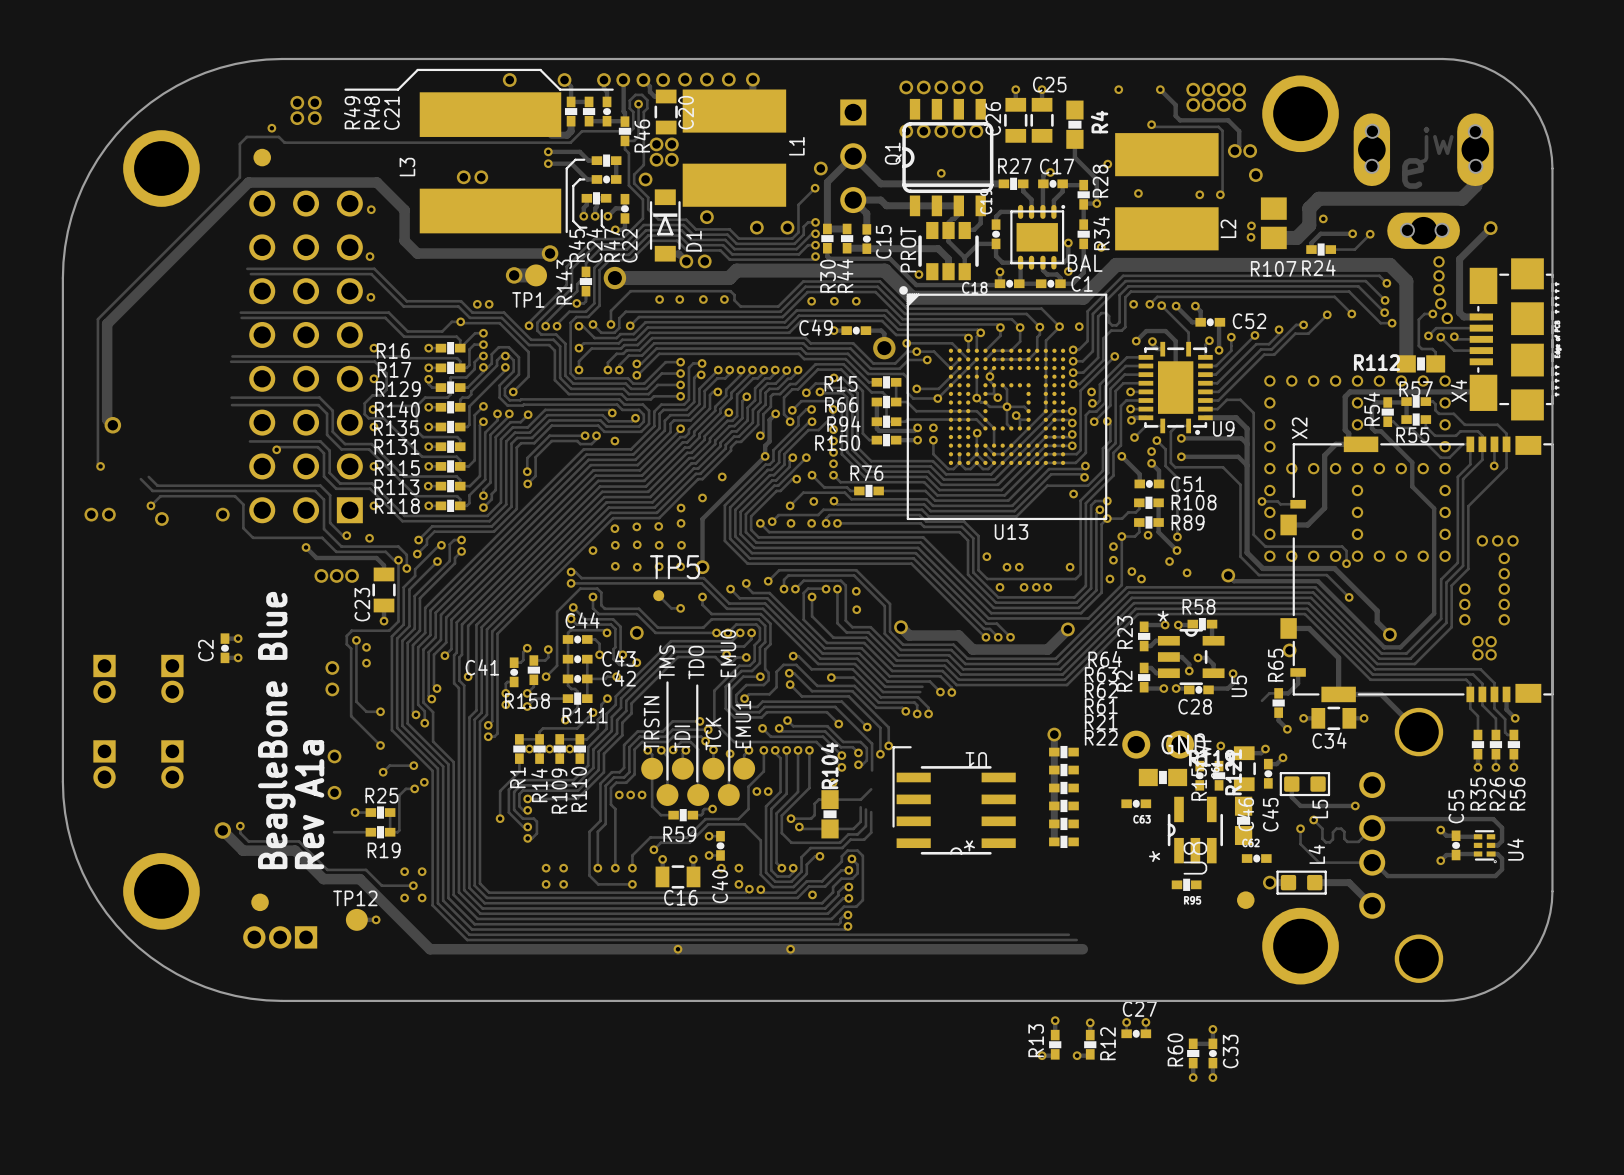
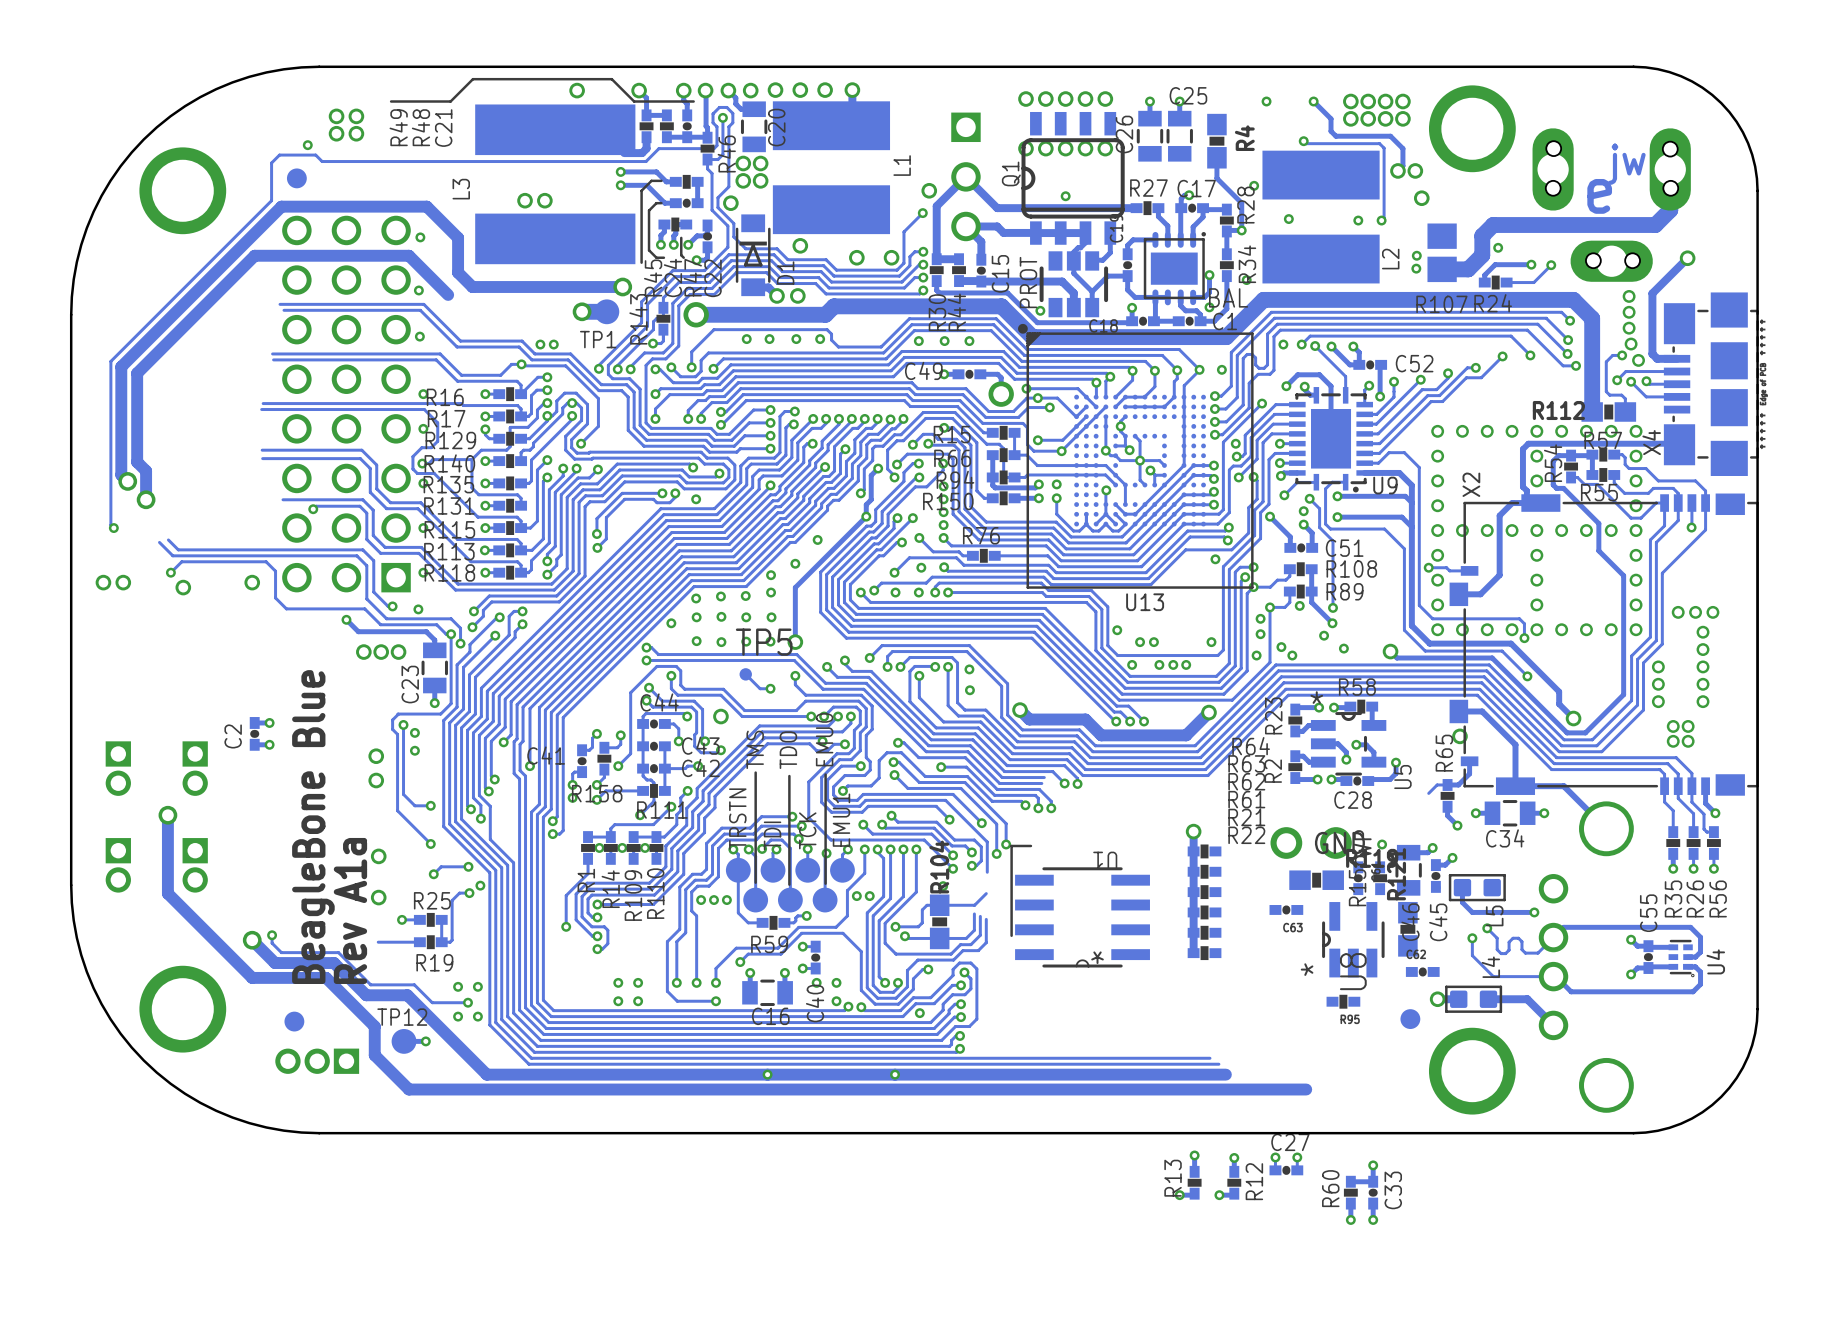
track: none -> (448, 294) (408, 255) (254, 255) (137, 373) (137, 462) (146, 471) (146, 499)
via: none -> (146, 499)
track: none -> (167, 815) (167, 893) (252, 977) (326, 977) (374, 1026) (374, 1055) (408, 1089) (1306, 1089)
via: none -> (167, 815)

